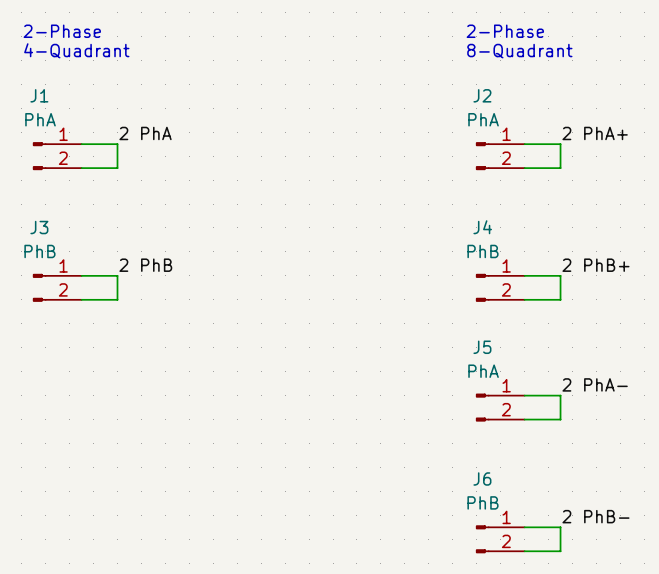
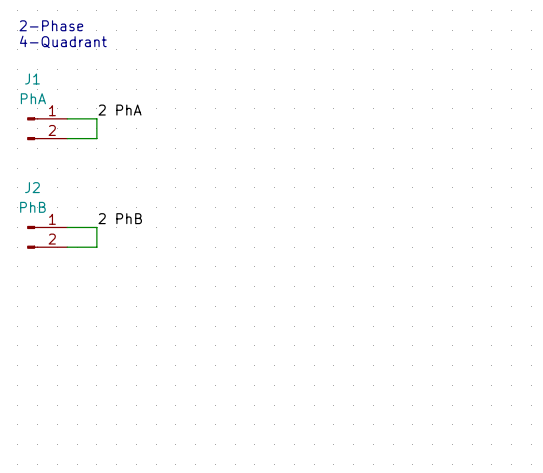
text: 2-Phase (505, 31) -> none
text: 8-Quadrant (519, 51) -> none
label: 2 PhA+ (595, 133) -> none
wire: (524, 144) (560, 144) (560, 168) (524, 168) -> none
J2: PhA (500, 156) -> none
J3 name: J3 (39, 227) -> J2 (32, 187)
label: 2 PhB+ (595, 265) -> none
wire: (524, 275) (560, 275) (560, 299) (524, 299) -> none
J4: PhB (500, 287) -> none
label: 2 PhA- (595, 384) -> none
wire: (524, 395) (560, 395) (560, 419) (524, 419) -> none
J5: PhA (500, 407) -> none
label: 2 PhB- (595, 516) -> none
wire: (524, 527) (560, 527) (560, 551) (524, 551) -> none
J6: PhB (500, 539) -> none

